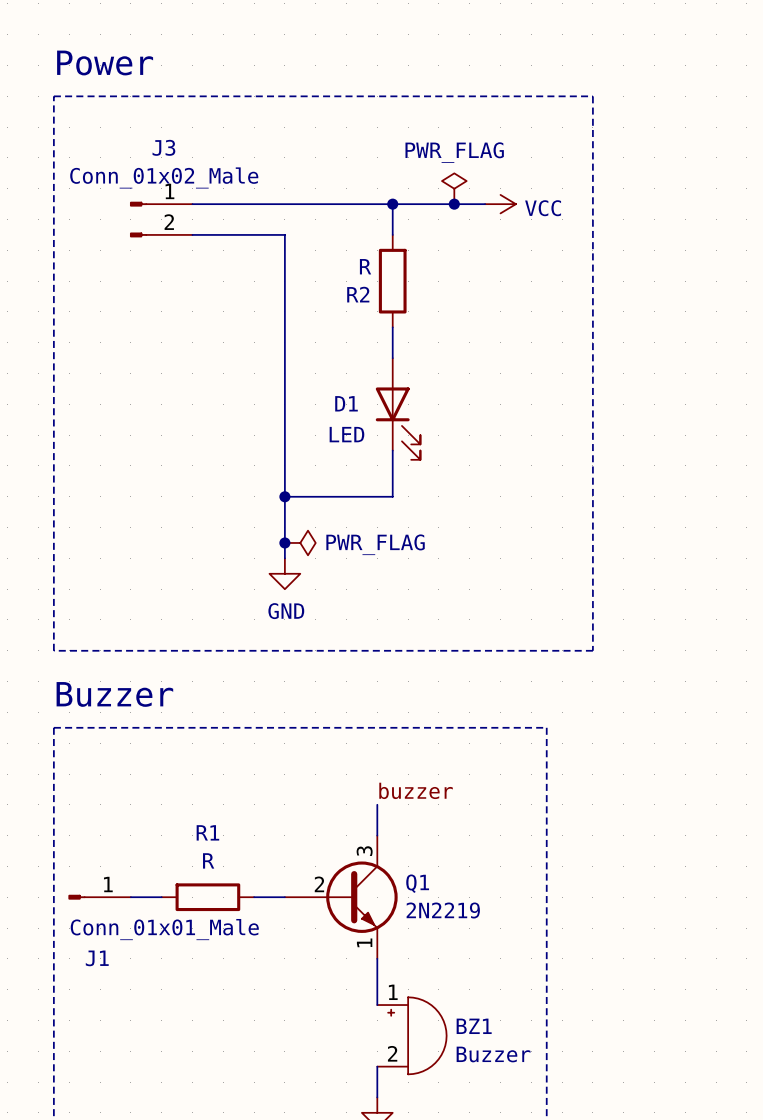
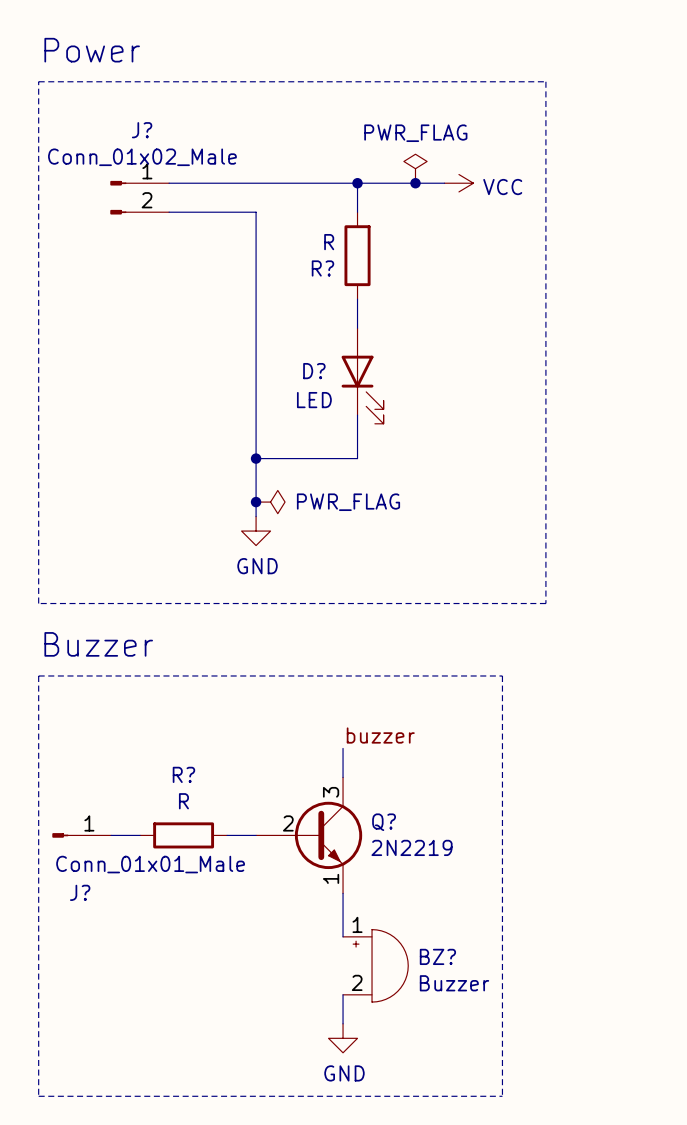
J3 name: J3 (163, 147) -> J? (142, 130)
R2 name: R2 (358, 294) -> R? (322, 268)
D1 name: D1 (346, 403) -> D? (314, 371)
R1 name: R1 (207, 832) -> R? (183, 774)
Q1 name: Q1 (417, 883) -> Q? (384, 822)
J1 name: J1 (97, 958) -> J? (80, 892)
BZ1 name: BZ1 (474, 1026) -> BZ? (437, 956)

